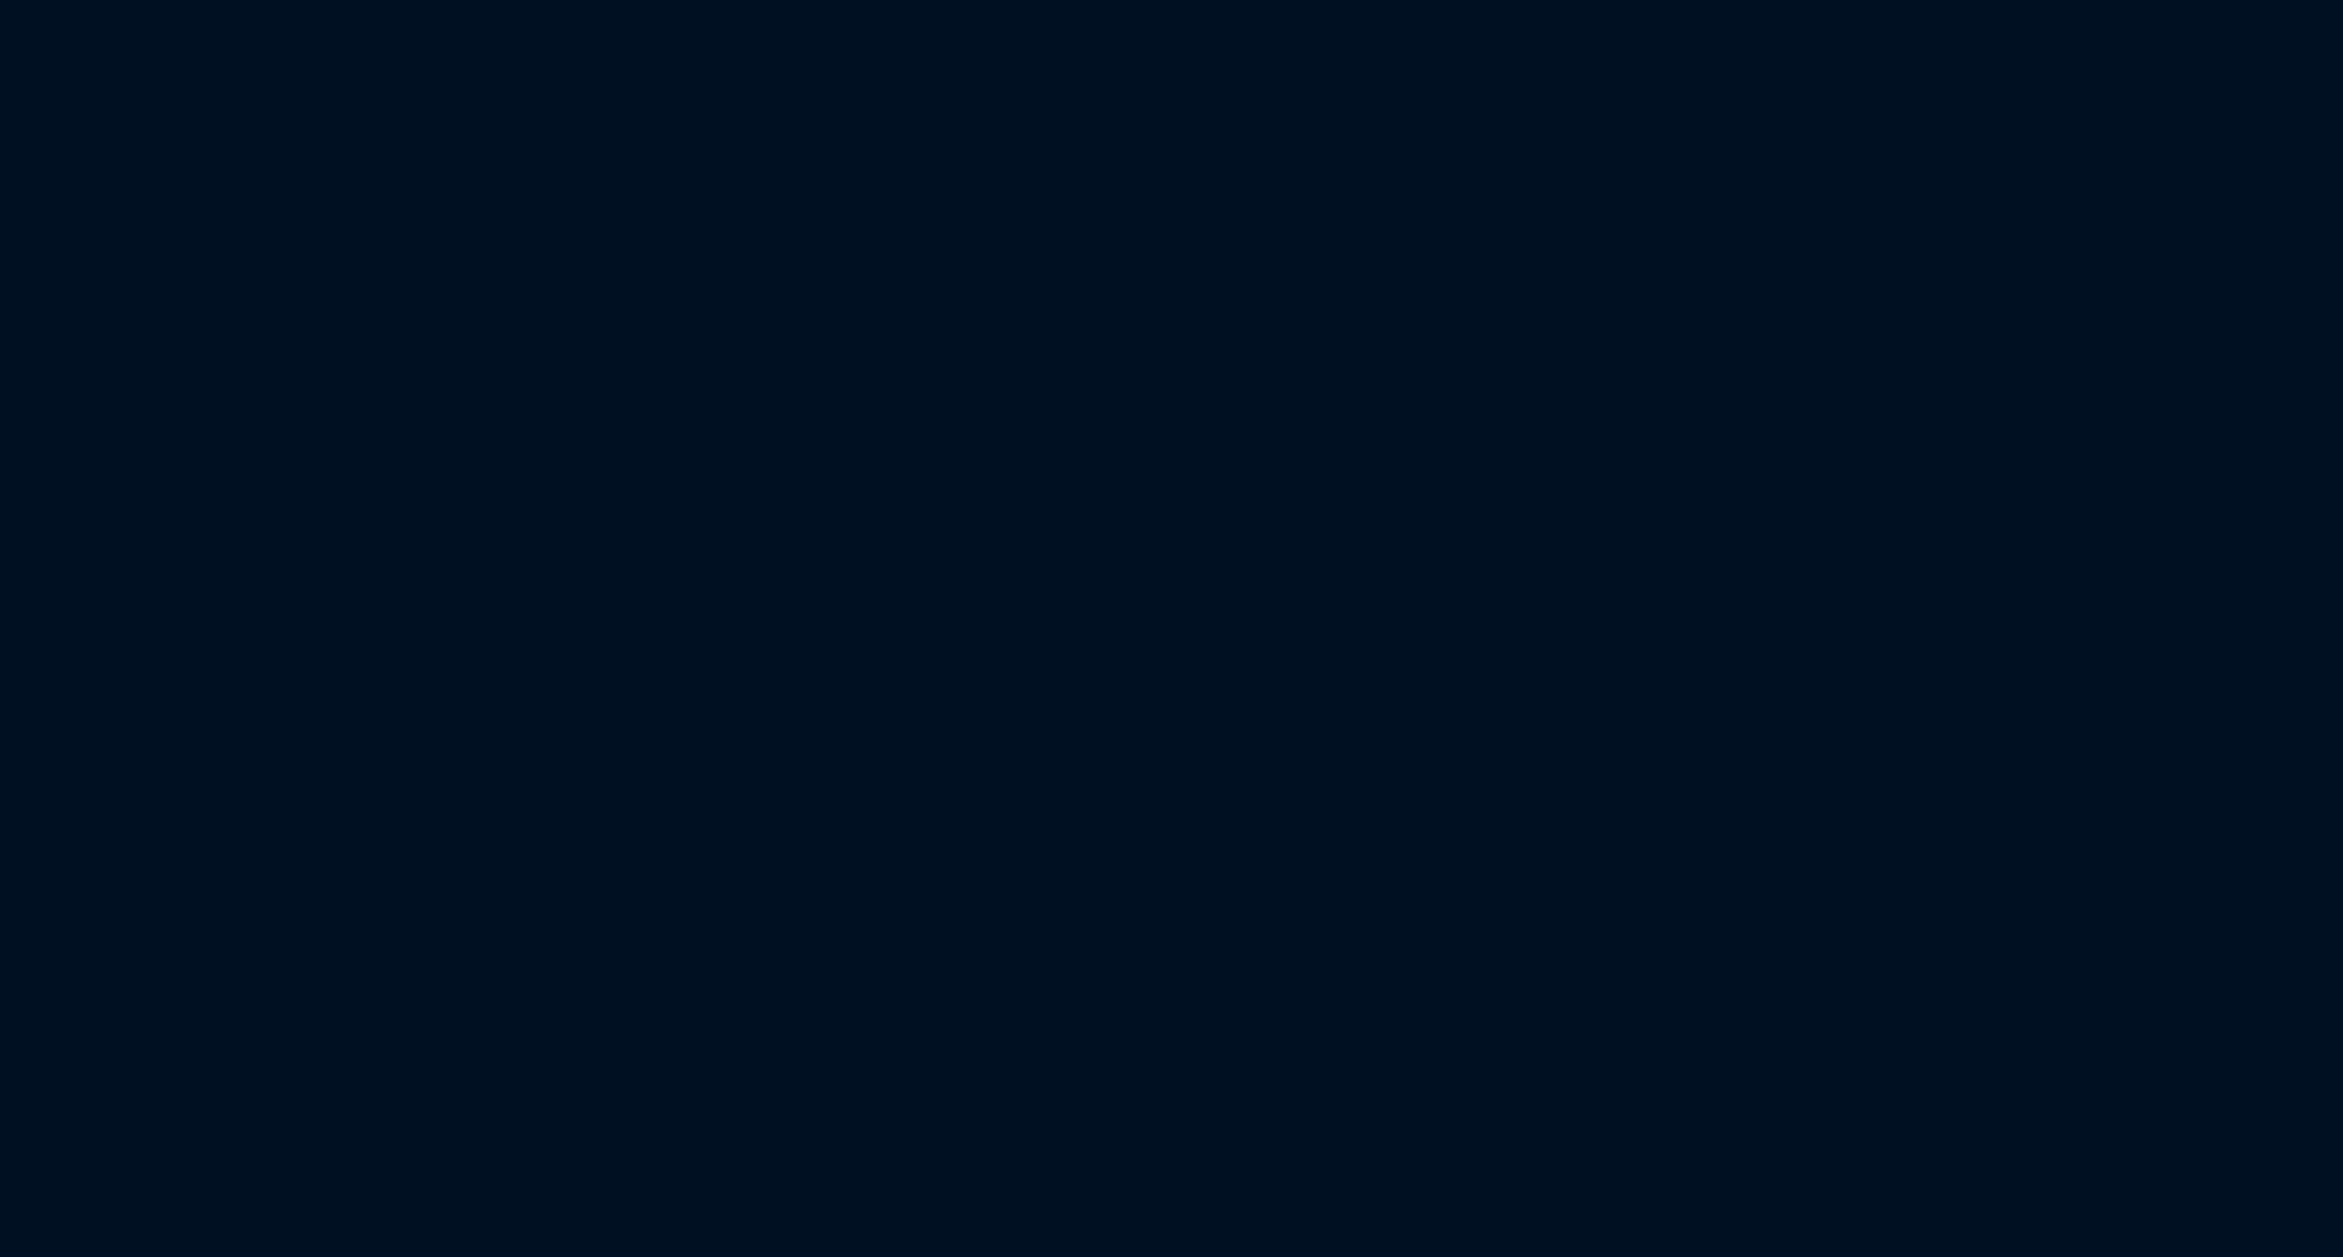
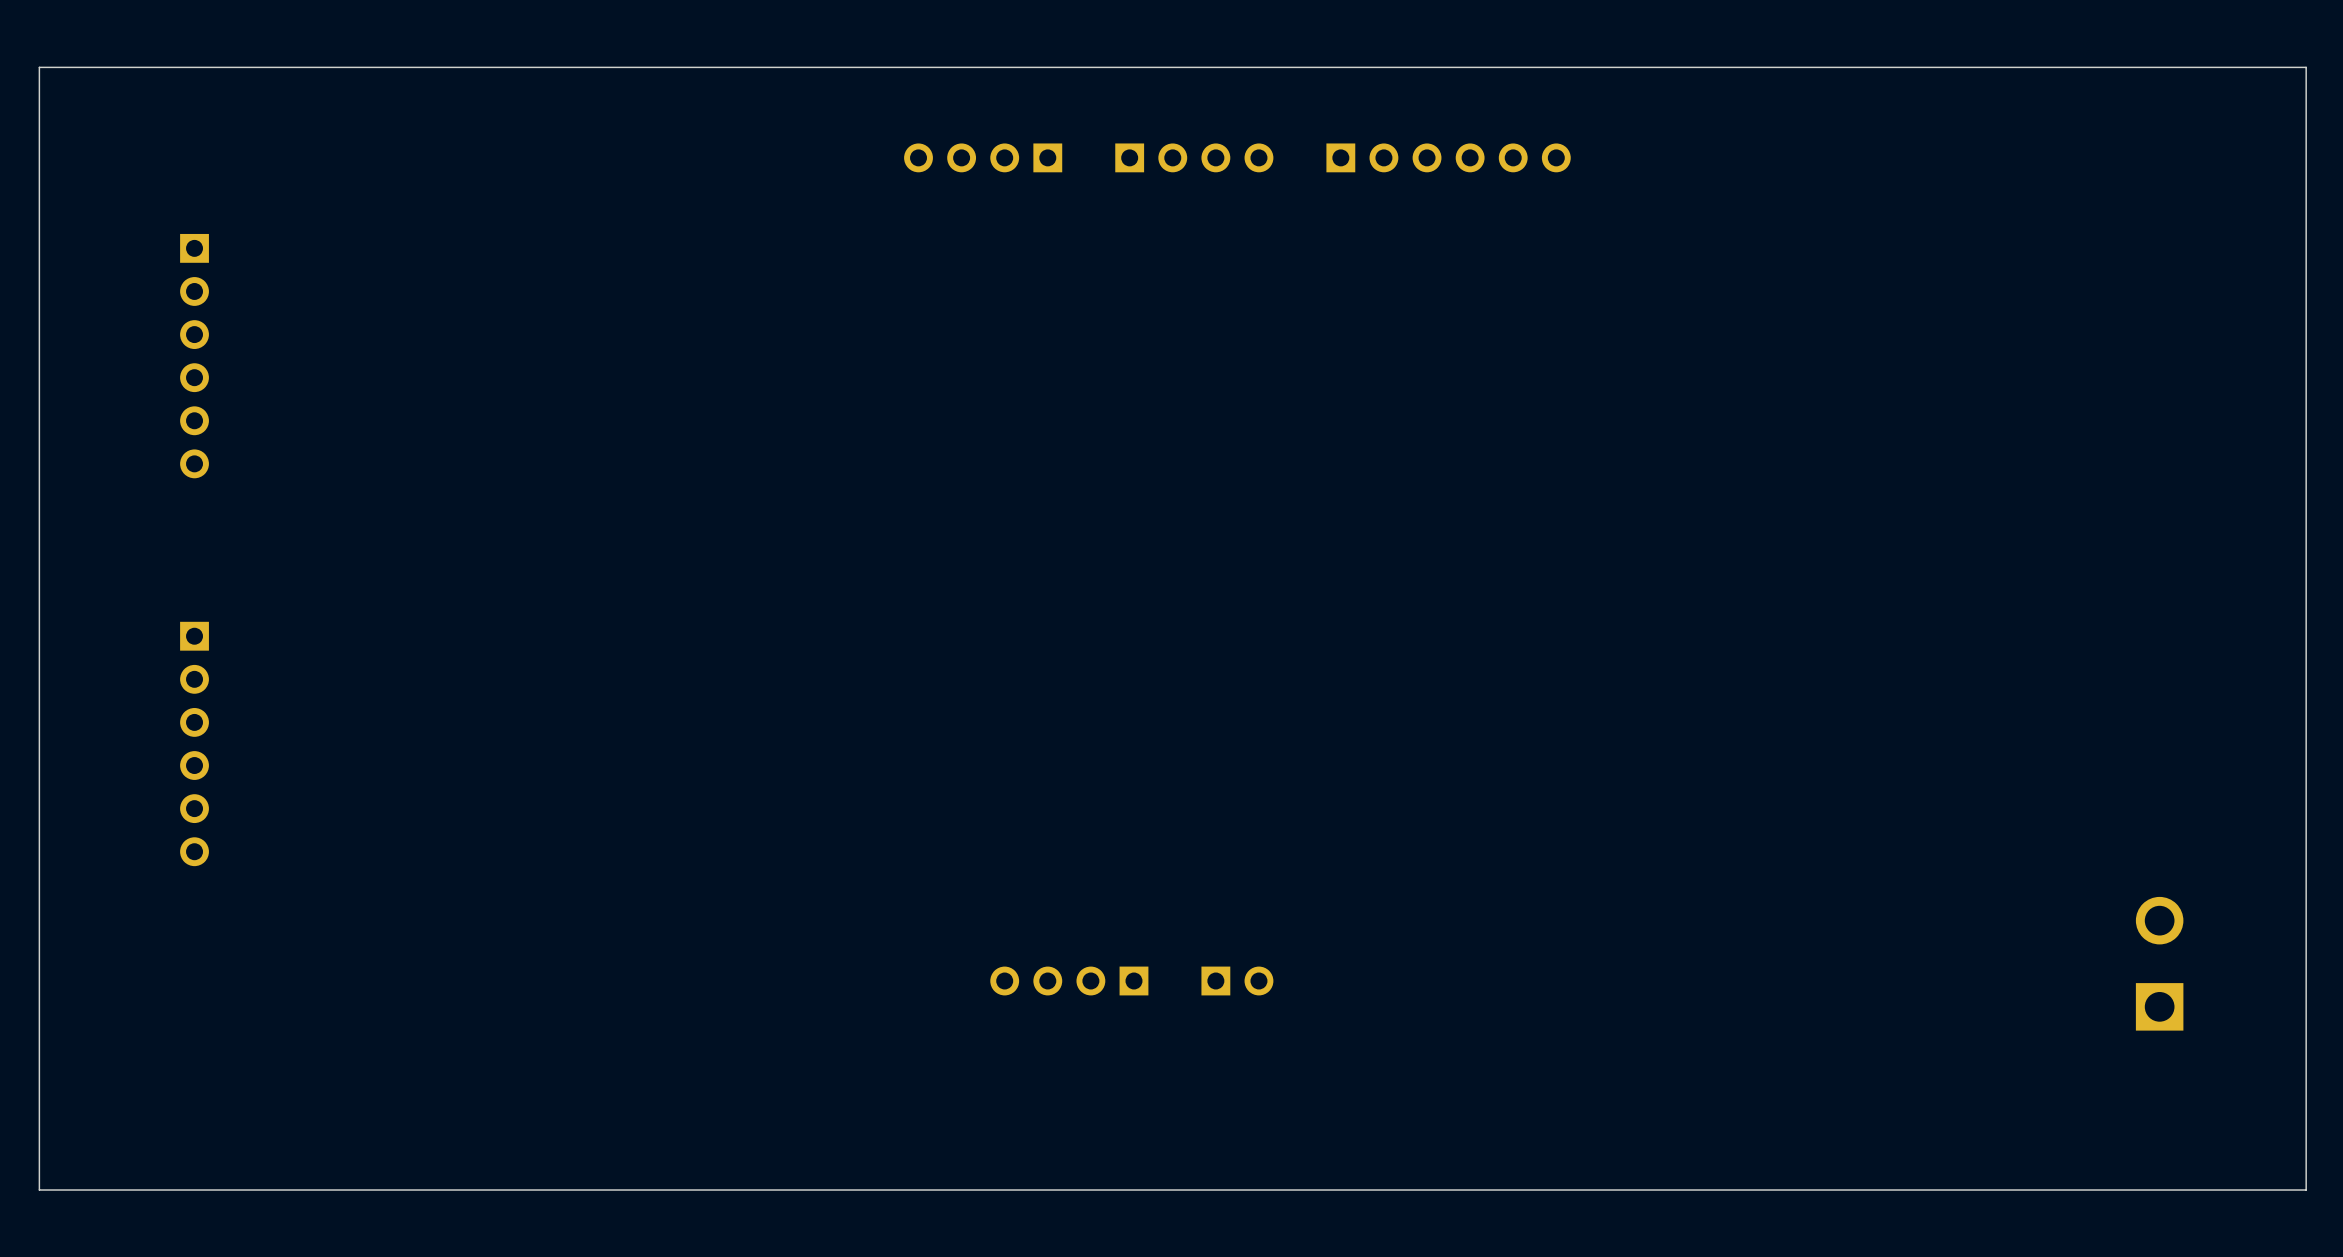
board edge: none -> (2306, 67) (39, 67) (39, 1190) (2306, 1190) (2306, 67)
part: none -> (983, 157)
part: none -> (1194, 157)
part: none -> (1448, 157)
part: none -> (194, 356)
part: none -> (194, 743)
part: none -> (2159, 963)
part: none -> (1069, 980)
part: none -> (1237, 980)

